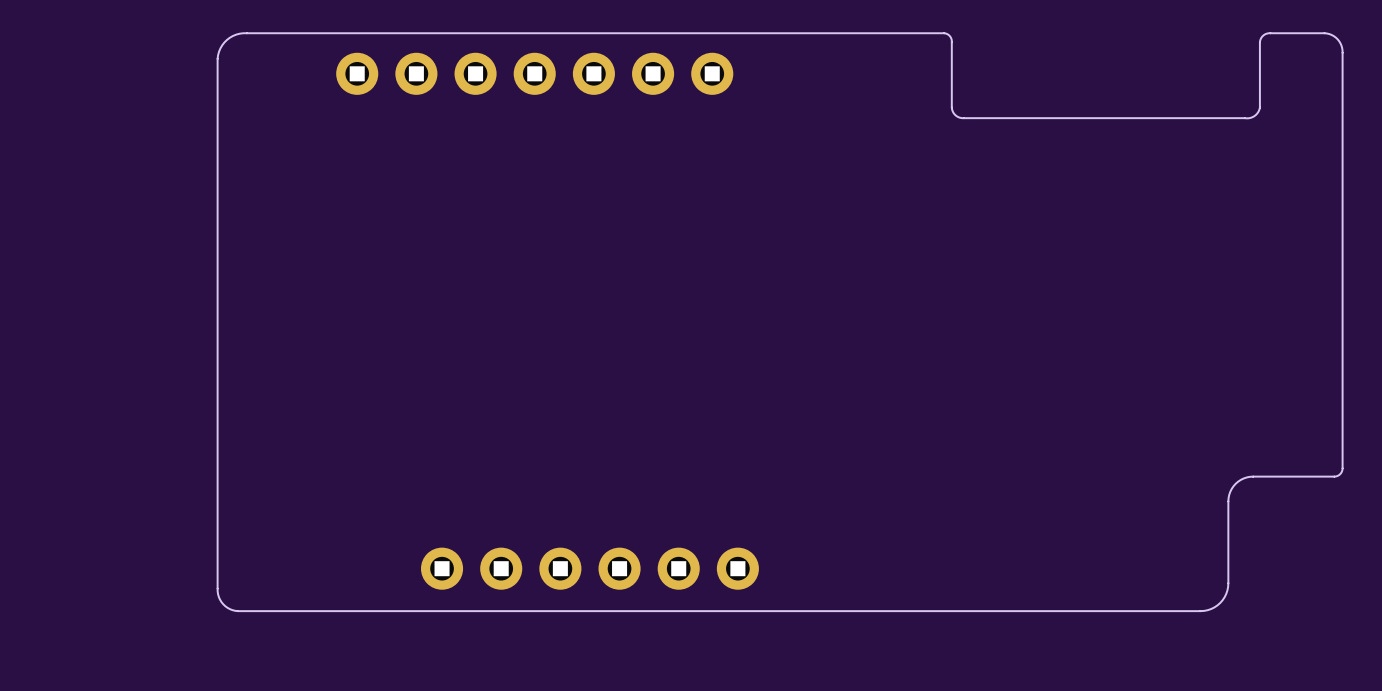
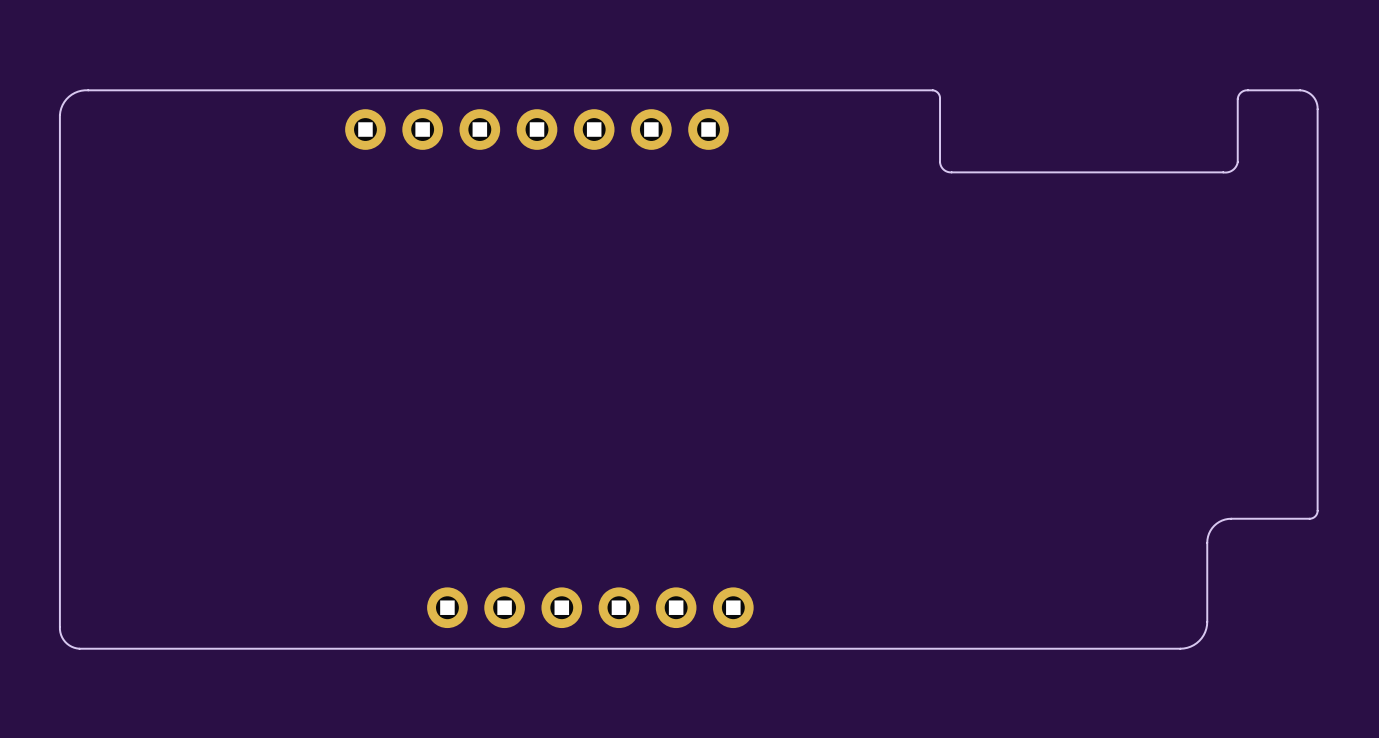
board edge: (246, 33) (236, 34) (226, 39) (220, 48) (217, 58) (217, 591) (219, 599) (225, 606) (237, 611) -> (258, 90) (84, 90) (74, 92) (66, 99) (59, 115) (61, 634) (69, 645) (79, 648) (250, 648)

